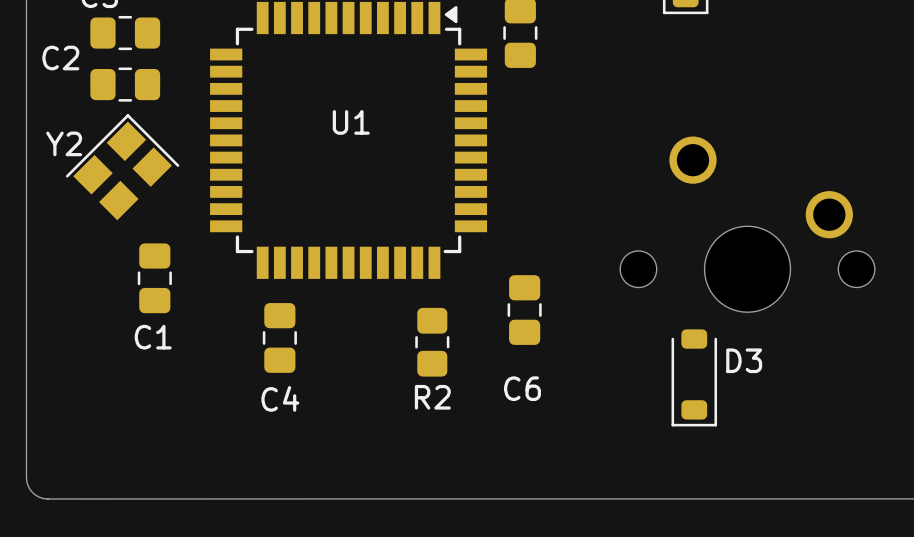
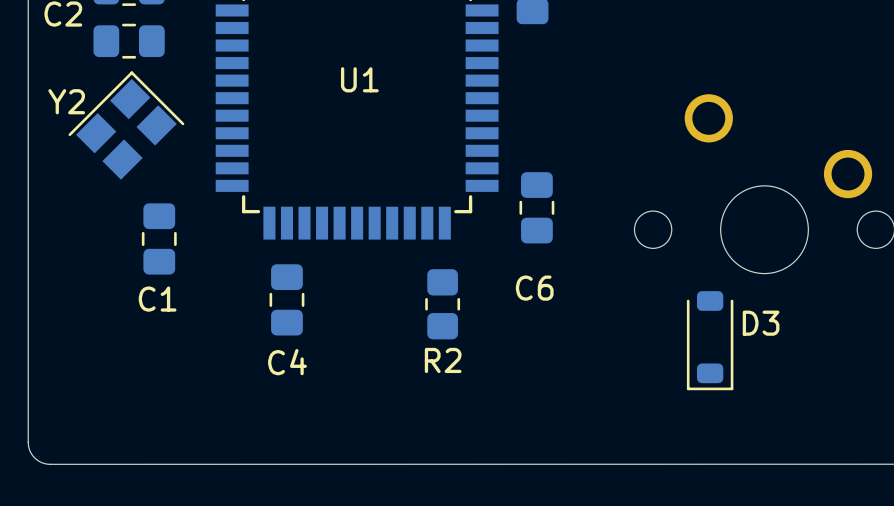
C6 position: (524, 310) -> (536, 207)

